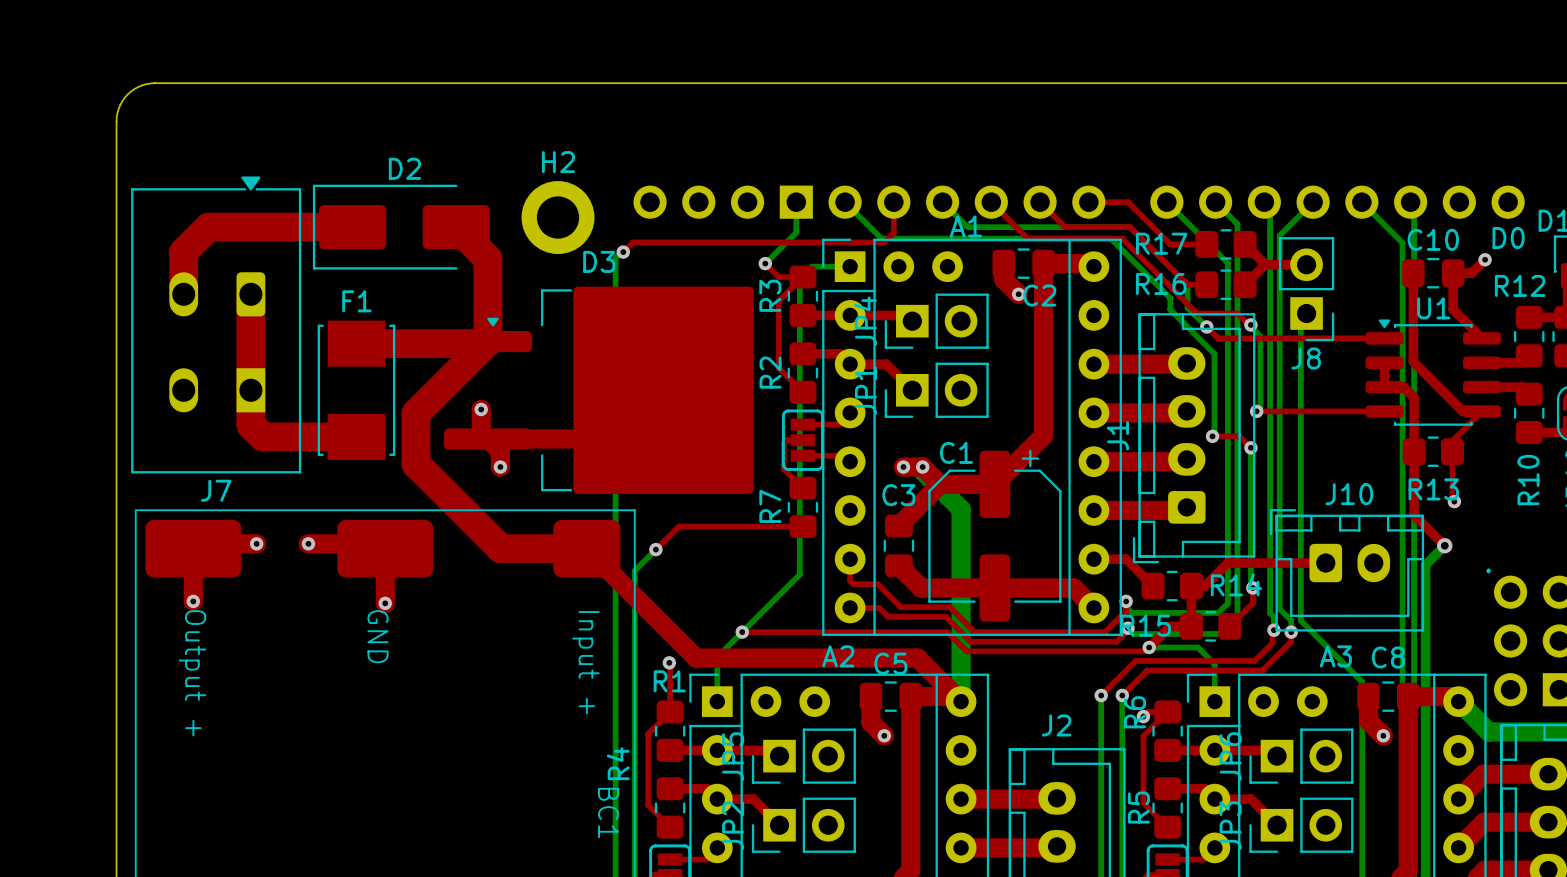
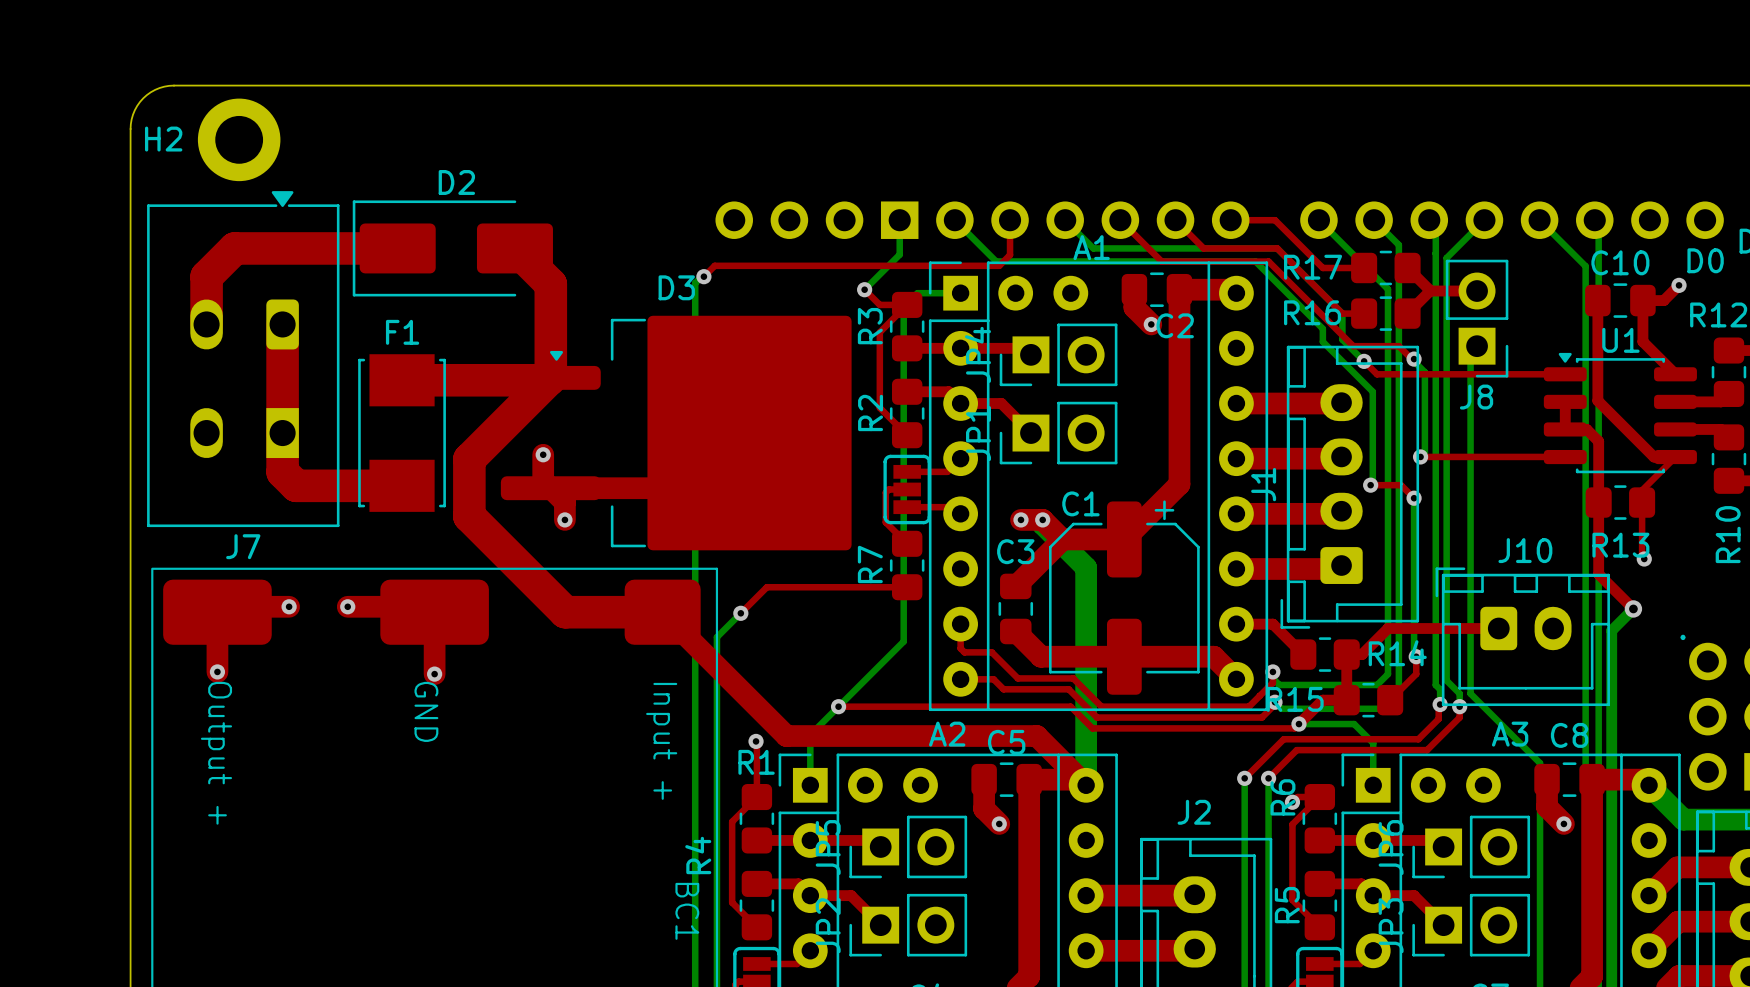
H2 name position: H2 (558, 162) -> H2 (163, 139)
H2 position: (558, 217) -> (239, 139)

